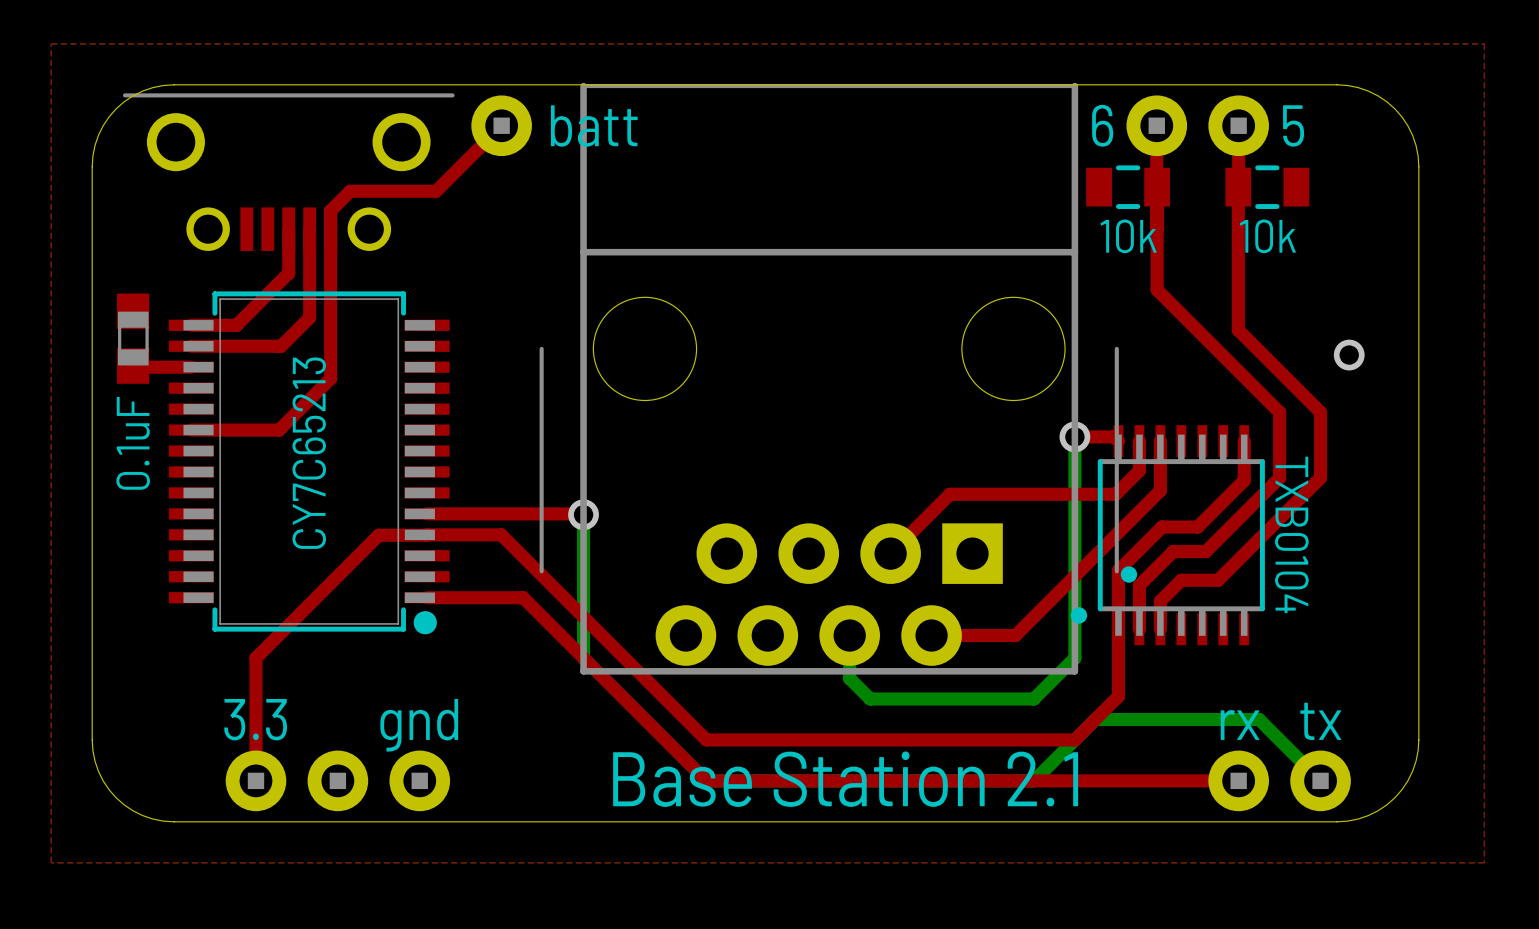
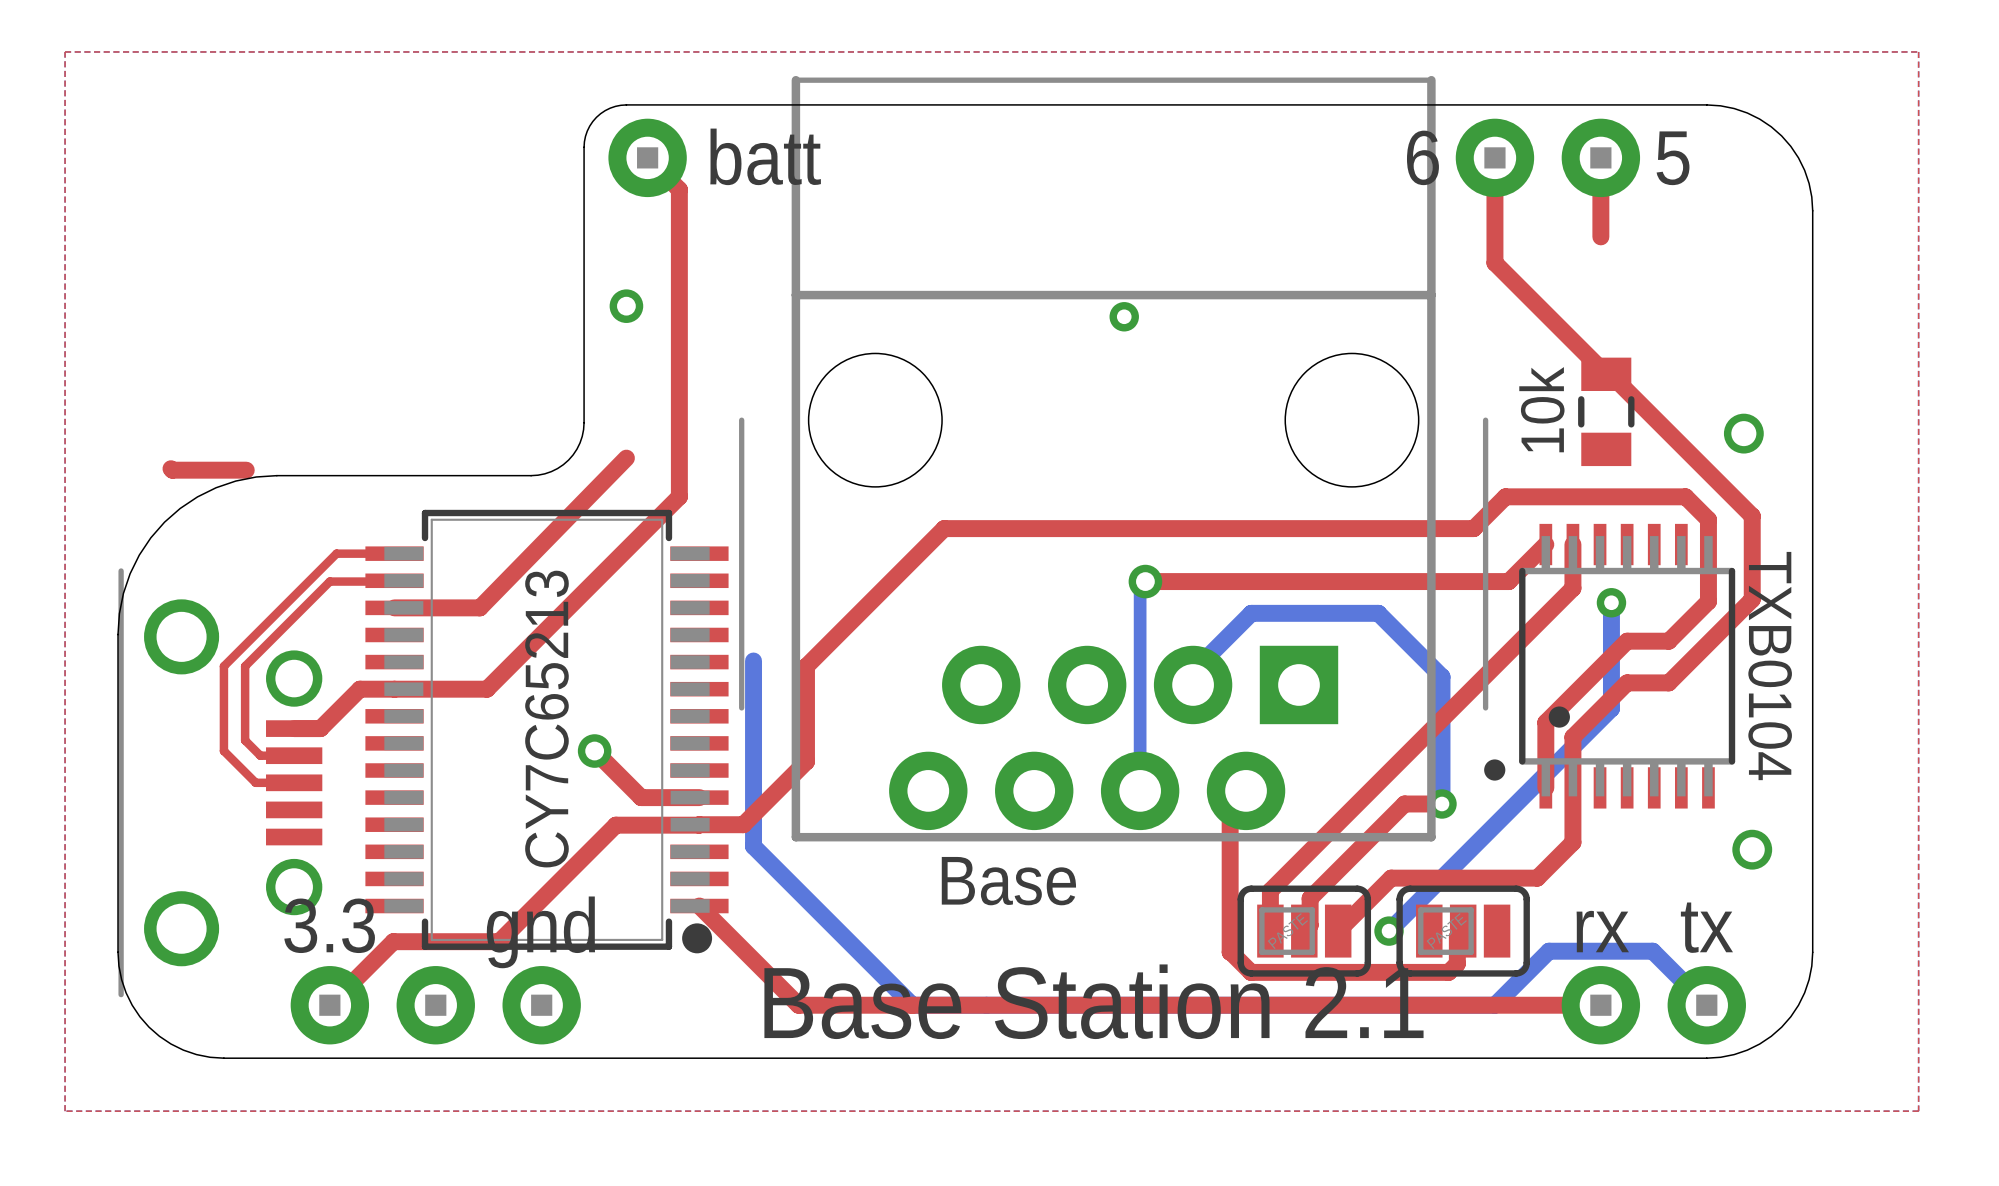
board edge: (485, 84) (174, 84) (142, 91) (116, 108) (98, 135) (92, 166) (92, 494) -> (626, 104) (610, 108) (596, 117) (587, 131) (584, 141) (584, 422) (580, 442) (568, 460) (557, 468) (538, 475) (276, 475) (235, 481) (216, 487) (180, 508) (164, 522) (139, 555) (123, 593) (118, 634)
board edge: (1320, 84) (1358, 87) (1386, 101) (1401, 116) (1412, 135) (1418, 166) (1418, 750) (1407, 780) (1386, 804) (1358, 819) (1320, 821) -> (1706, 104) (1734, 108) (1747, 112) (1771, 126) (1781, 135) (1790, 146) (1804, 170) (1809, 183) (1812, 210) (1811, 966) (1804, 992) (1790, 1016) (1781, 1027) (1771, 1036) (1747, 1050) (1734, 1054) (1706, 1058)
top track: (501, 125) (436, 191) (350, 191) (330, 210) (330, 378) (279, 430) (191, 430) -> (647, 157) (679, 189) (679, 496) (488, 687)
part rotation: 0° (288, 172) -> 90° counterclockwise (220, 782)
part position: (288, 172) -> (220, 782)
top track: none -> (1494, 236) (1494, 262) (1606, 374) (1610, 374) (1752, 516) (1752, 599) (1668, 682) (1627, 682) (1572, 737) (1572, 842) (1537, 878) (1391, 878) (1338, 931)
part: 10k (1128, 187) -> none
top track: (1238, 187) (1238, 330) (1320, 412) (1320, 477) (1218, 580) (1181, 580) (1160, 601) (1160, 629) -> none
part: 10k (1267, 187) -> none
top track: (288, 229) (288, 273) (236, 325) (191, 325) -> none
top track: (309, 229) (309, 317) (281, 346) (191, 346) -> none
top track: (1156, 231) (1157, 187) (1157, 289) (1279, 412) (1279, 477) (1205, 551) (1173, 551) (1139, 585) (1139, 629) -> none
via: none -> (626, 306)
via: none -> (1124, 316)
part: none -> 10k (1606, 411)
part: 0.1uF (133, 338) -> none
via position: (1349, 355) -> (1743, 433)
top track: none -> (626, 458) (479, 607) (394, 607)
part position: (829, 378) -> (1113, 458)
top track: none -> (1545, 544) (1508, 581) (1145, 581)
top track: none -> (1572, 544) (1572, 588) (1270, 890) (1270, 931)
top track: none -> (394, 553) (336, 553) (223, 666) (223, 751) (255, 782) (294, 782)
bottom track: (1074, 436) (1074, 658) (1033, 698) (870, 698) (849, 678) (849, 635) -> none
top track: (1074, 436) (1114, 436) (1118, 441) -> none
via: (1074, 436) -> none
top track: (1139, 441) (1139, 470) (1115, 494) (950, 494) (890, 553) (892, 553) -> none
top track: (1160, 441) (1160, 490) (1015, 635) (931, 635) -> none
top track: (1244, 441) (1244, 480) (1197, 527) (1162, 527) (1118, 570) (1118, 696) (1074, 739) (952, 739) -> (1463, 931) (1457, 936) (1457, 963) (1448, 972) (1251, 972) (1230, 952)
top track: none -> (394, 580) (329, 581) (245, 666) (245, 740) (260, 755) (294, 755)
bottom track: none -> (1145, 581) (1140, 586) (1140, 790)
via: none -> (1145, 581)
part position: (309, 462) -> (546, 731)
bottom track: none -> (1611, 602) (1611, 708) (1389, 931)
via: none -> (1611, 602)
top track: (427, 513) (583, 514) -> none
via: (583, 514) -> none
bottom track: none -> (1193, 684) (1193, 671) (1251, 613) (1378, 613) (1441, 676) (1441, 803)
top track: (427, 534) (501, 534) (706, 739) (952, 739) -> (1246, 790) (1230, 806) (1230, 952)
top track: (378, 535) (426, 535) -> none
part position: (1167, 535) -> (1609, 666)
top track: (377, 536) (255, 658) (255, 780) -> (698, 825) (615, 825) (499, 941) (393, 941) (329, 1005)
top track: none -> (487, 689) (359, 689) (320, 728) (294, 728)
top track: none -> (594, 751) (641, 797) (699, 797)
via: none -> (594, 751)
top track: (427, 597) (523, 597) (706, 780) -> (699, 906) (798, 1005) (912, 1005)
top track: none -> (1545, 787) (1545, 722) (1627, 641) (1668, 641) (1708, 601) (1708, 519) (1685, 496) (1505, 496) (1473, 528) (944, 528) (806, 666) (806, 761) (743, 824) (699, 824)
top track: none -> (1441, 803) (1404, 803) (1310, 898) (1310, 925) (1304, 931)
via: none -> (1441, 803)
via: none -> (1752, 849)
text: none -> Base (1008, 881)
part: none -> (1304, 931)
via: none -> (1389, 931)
part: none -> (1463, 931)
bottom track: (1278, 739) (1259, 719) (1095, 719) (1033, 780) -> (1652, 951) (1548, 951) (1494, 1005) (1336, 1005)

